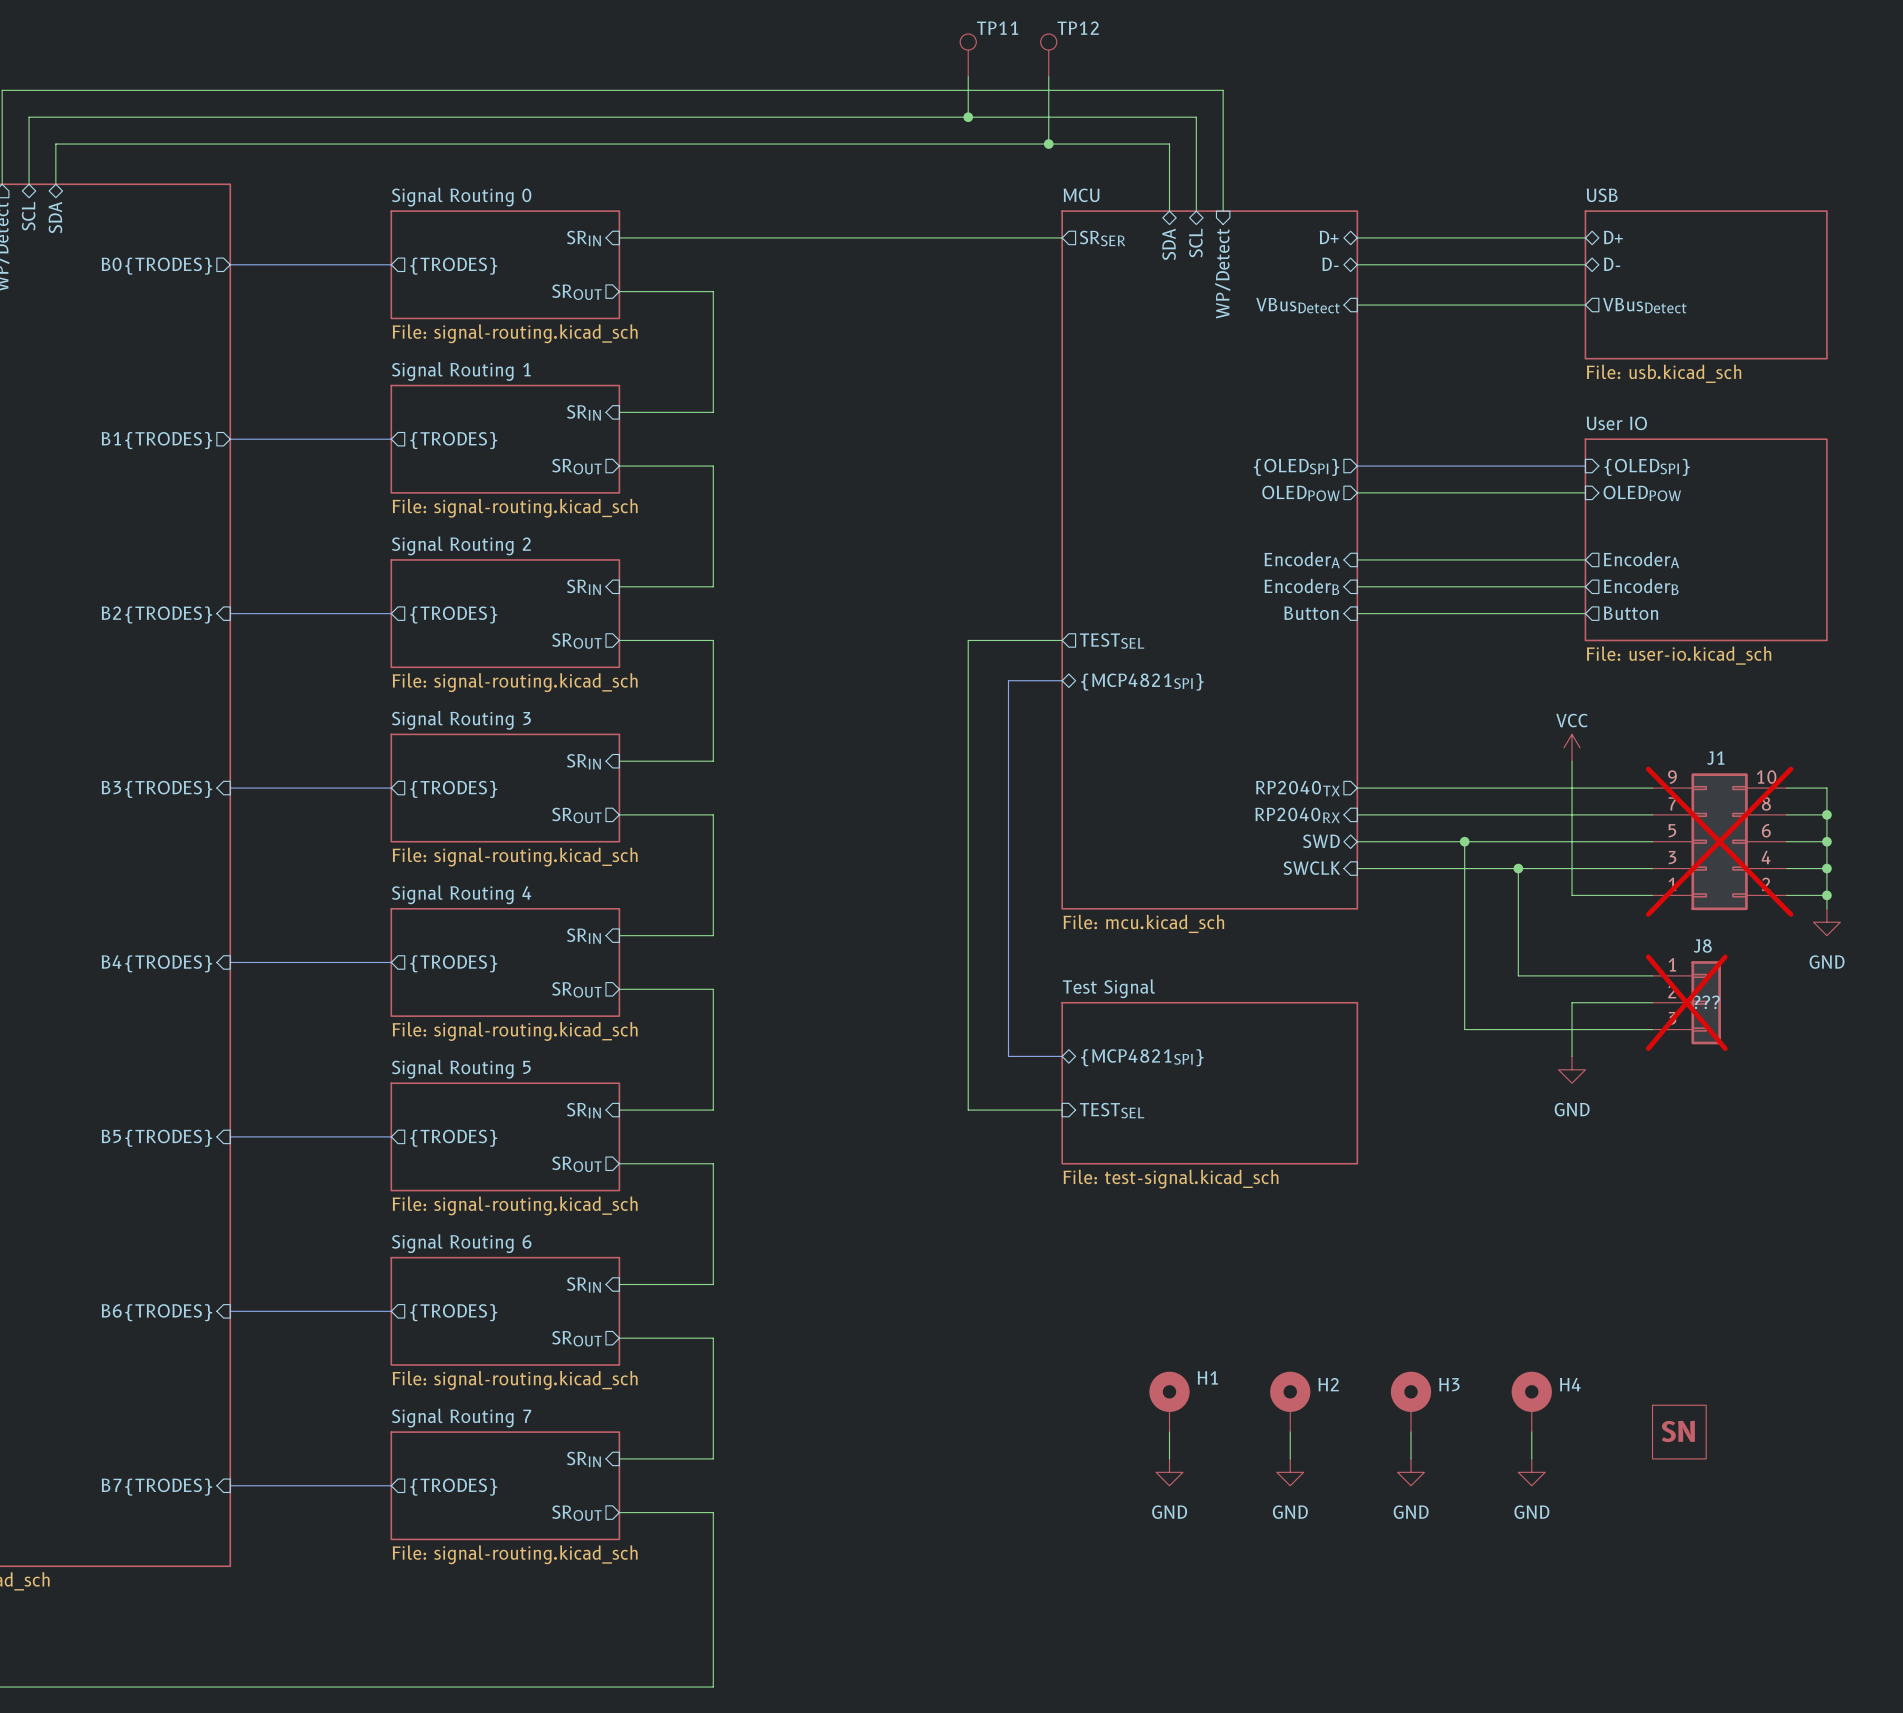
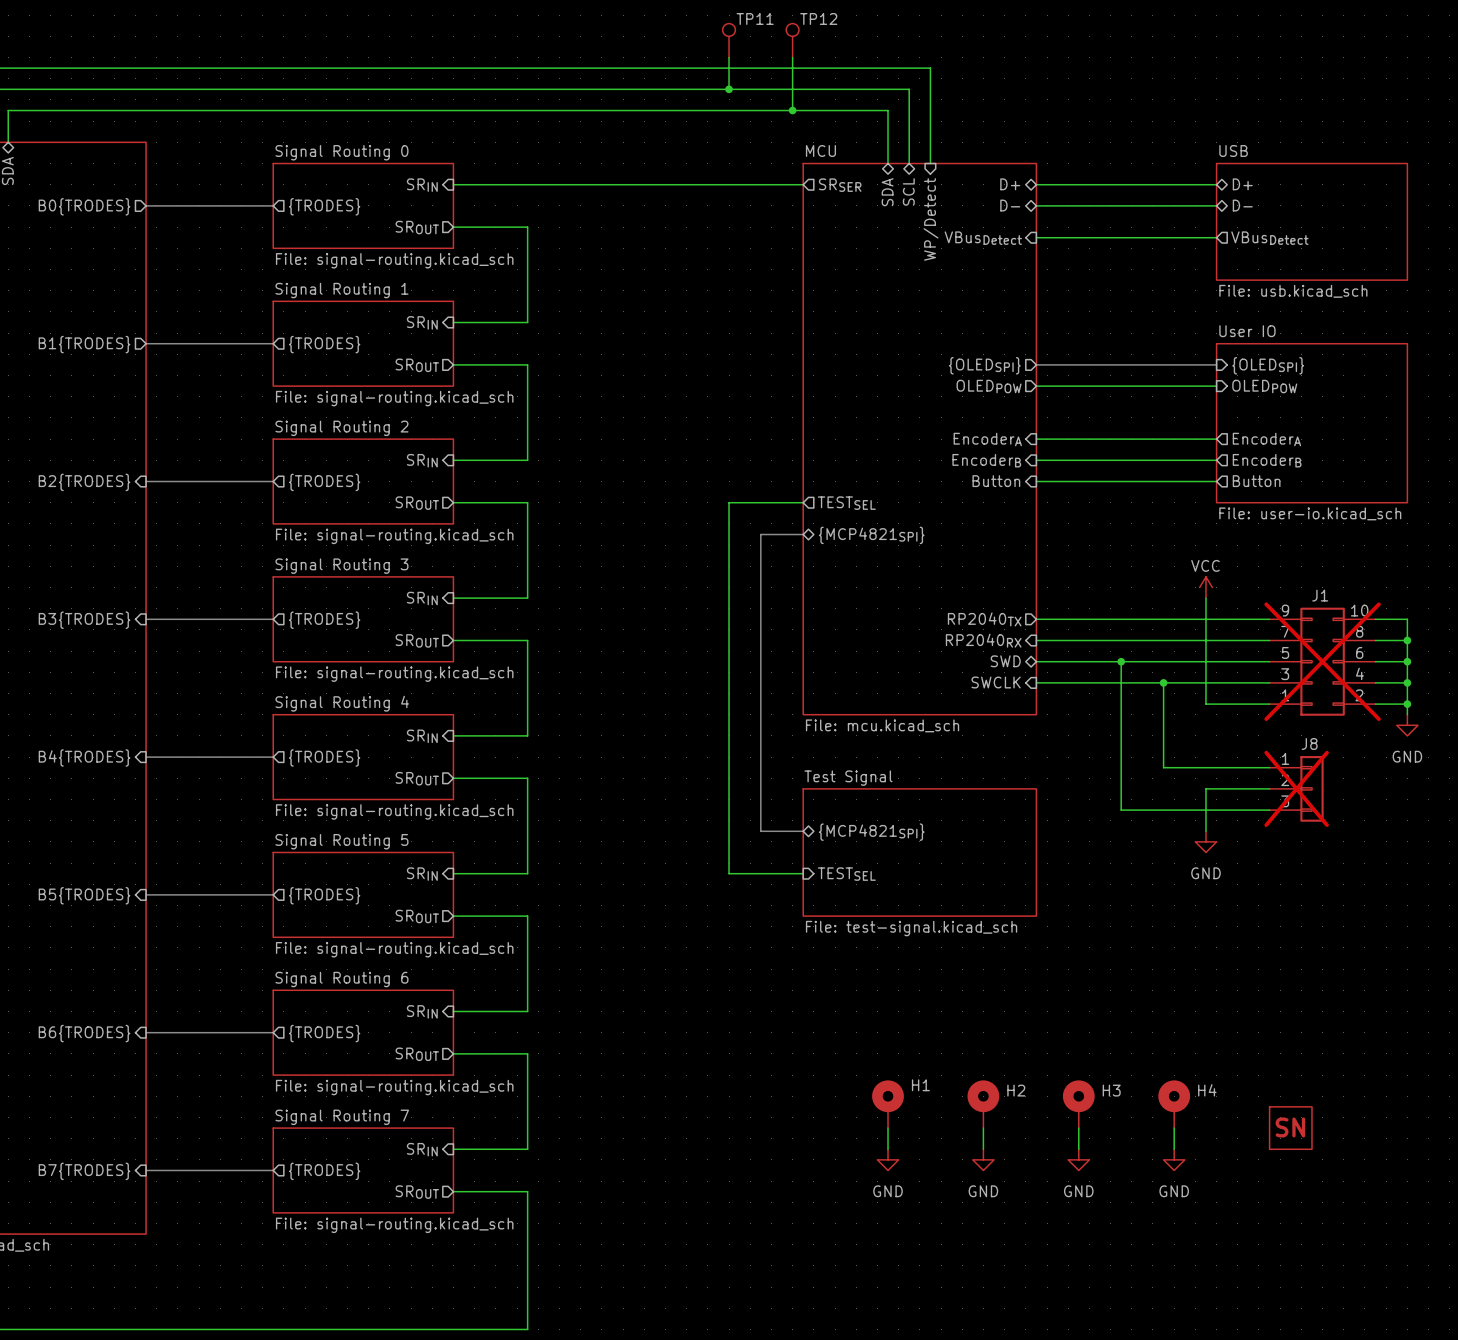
J8 text: ??? (1706, 1002) -> none

